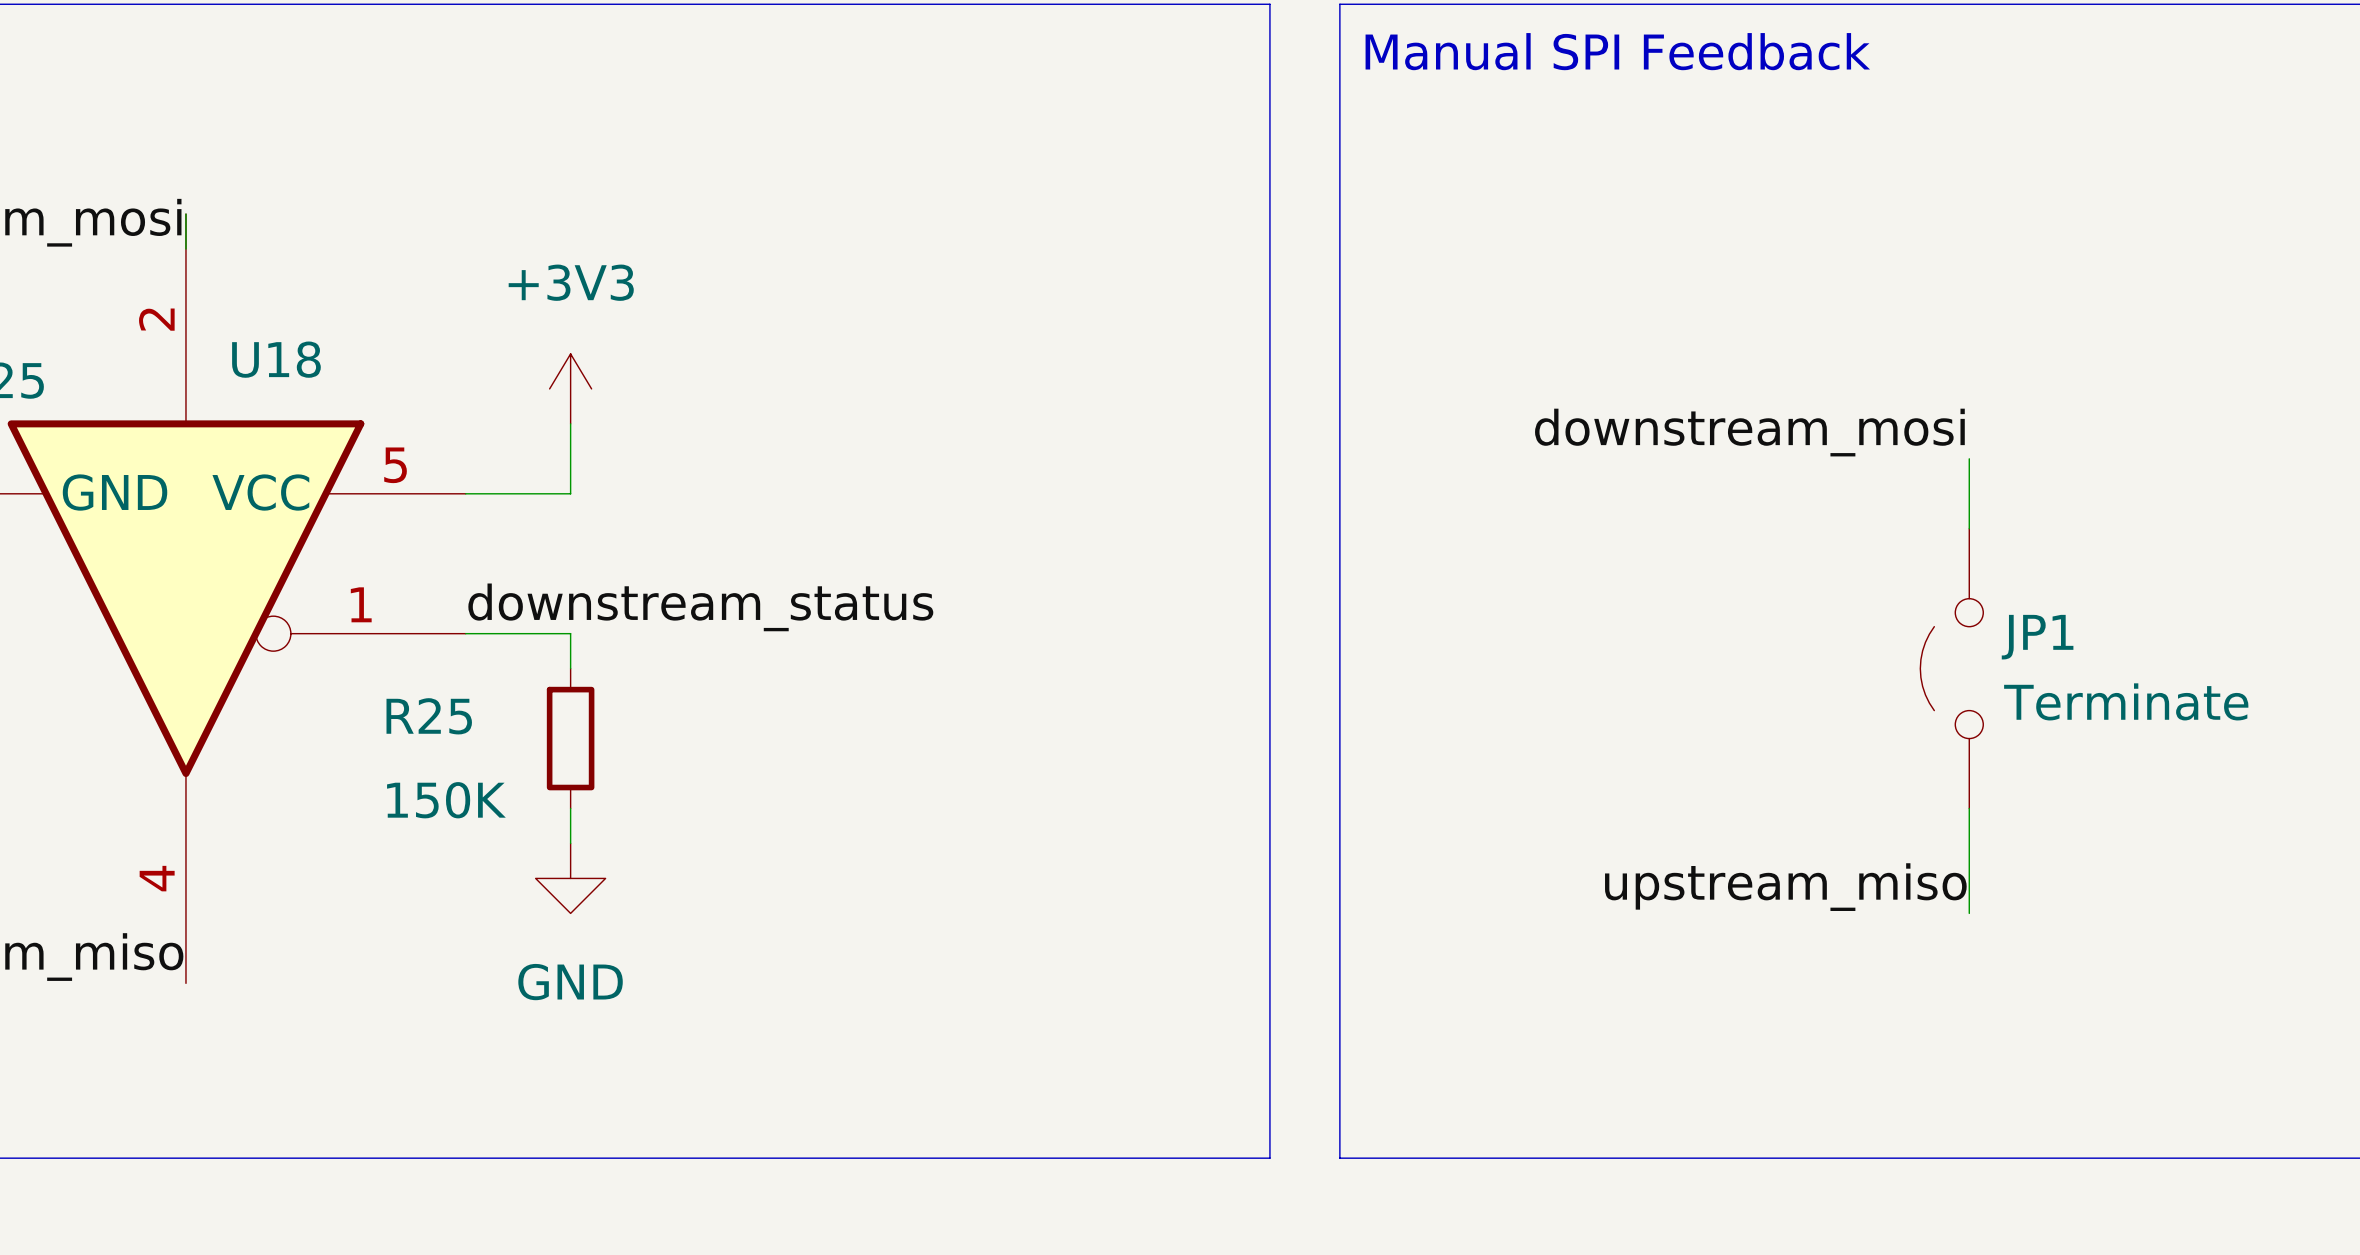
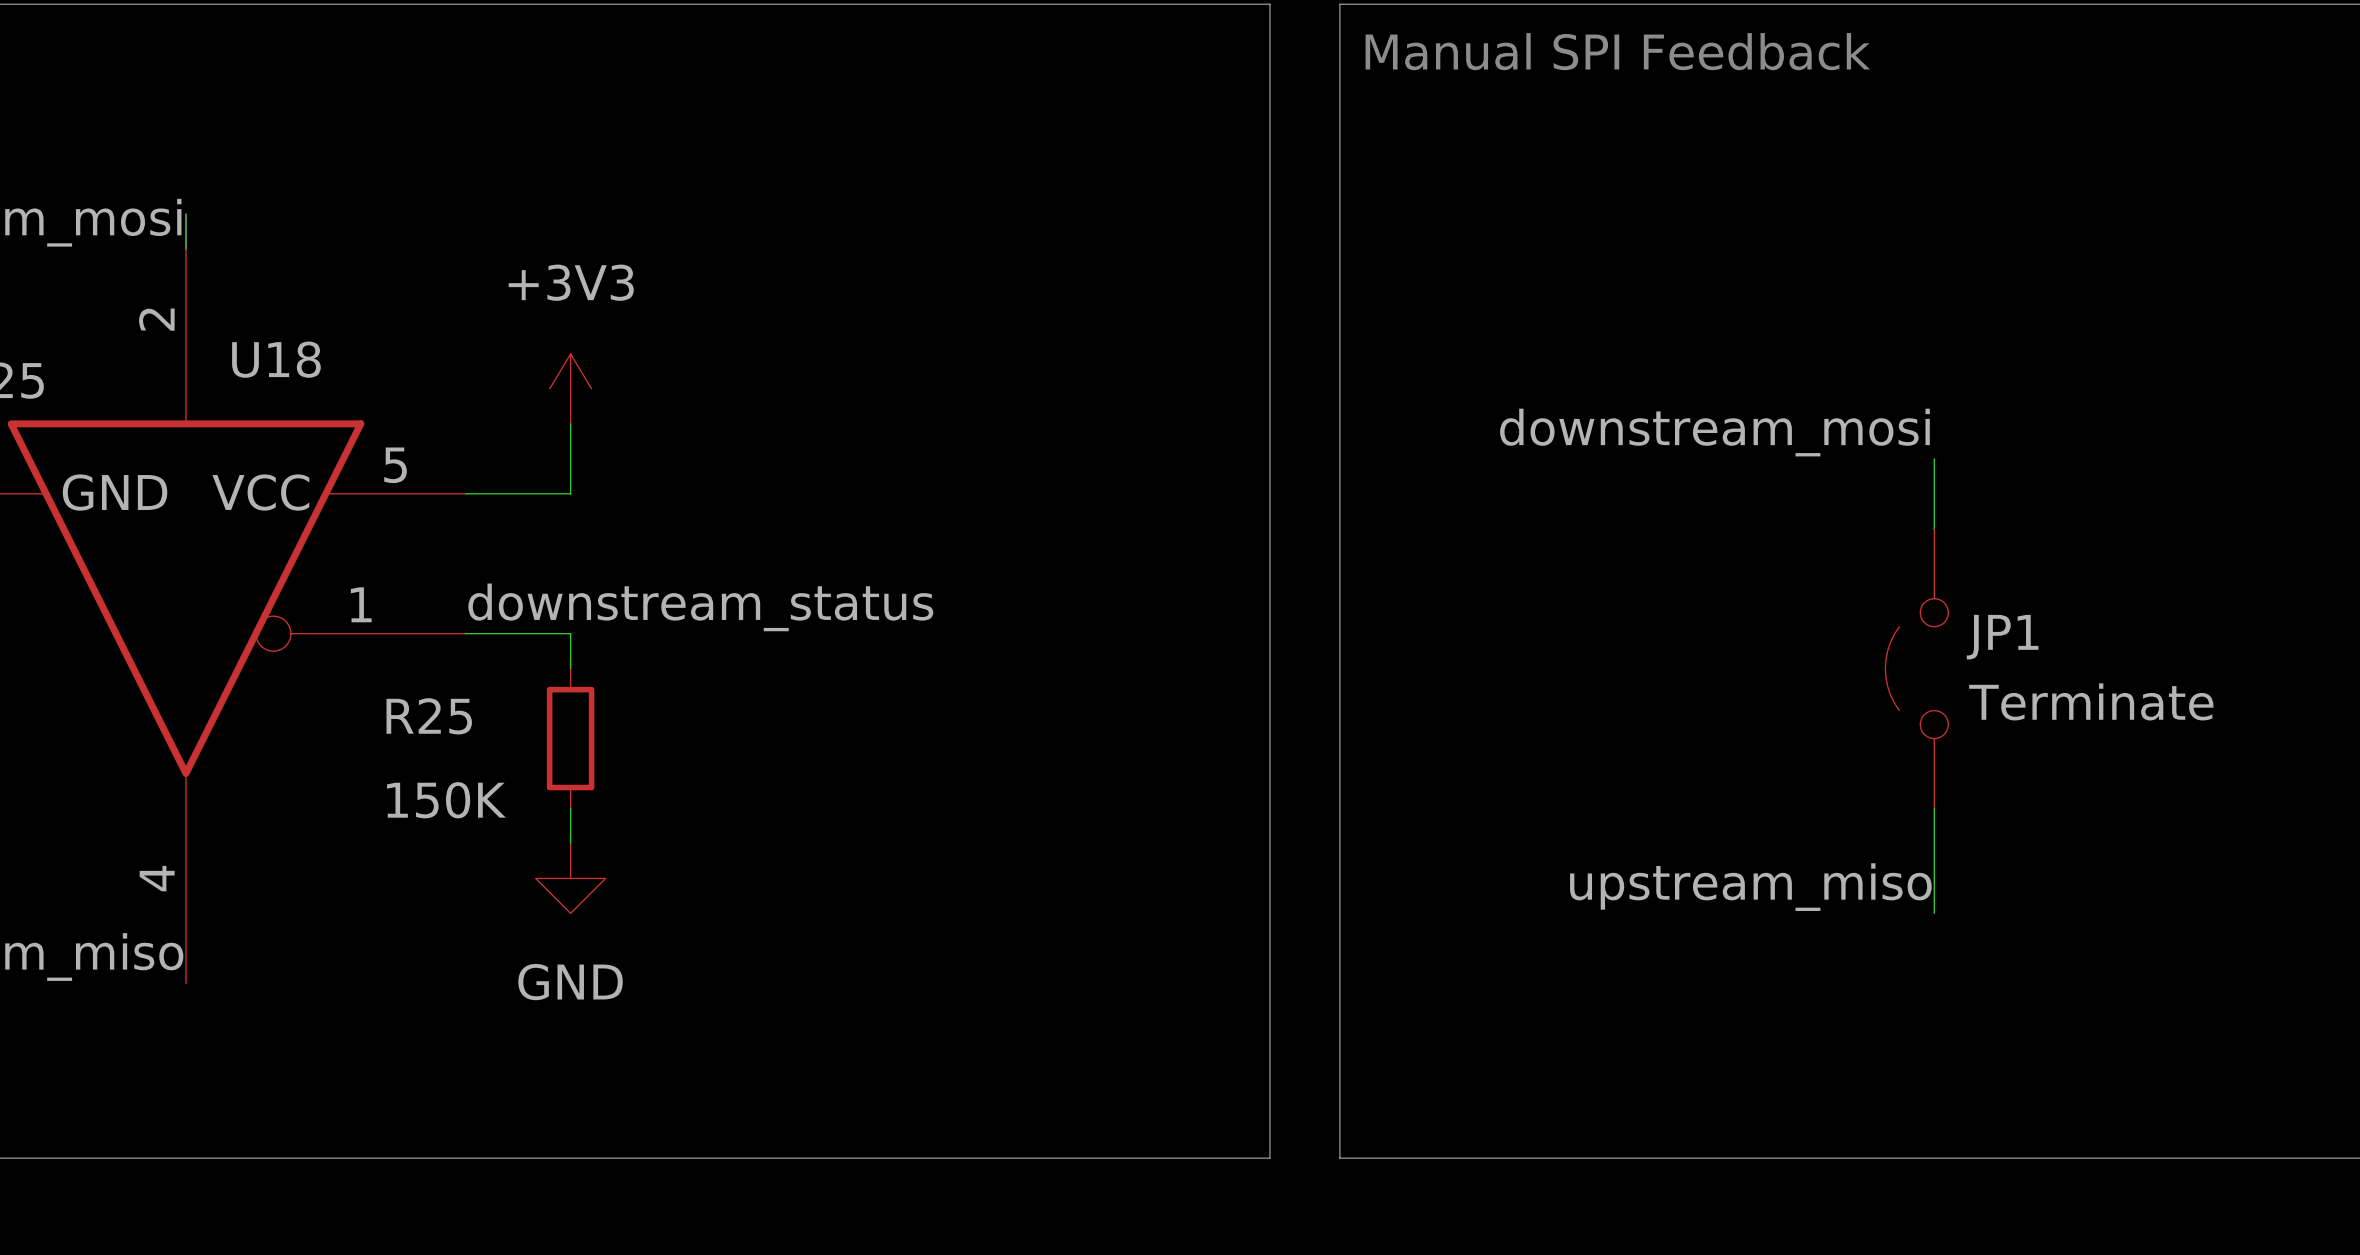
label position: downstream_mosi (1749, 432) -> downstream_mosi (1714, 432)
wire: (1969, 458) (1969, 528) -> (1934, 458) (1934, 528)
JP1 position: (1951, 668) -> (1916, 668)
wire: (1969, 808) (1969, 913) -> (1934, 808) (1934, 913)
label position: upstream_miso (1785, 887) -> upstream_miso (1750, 887)

